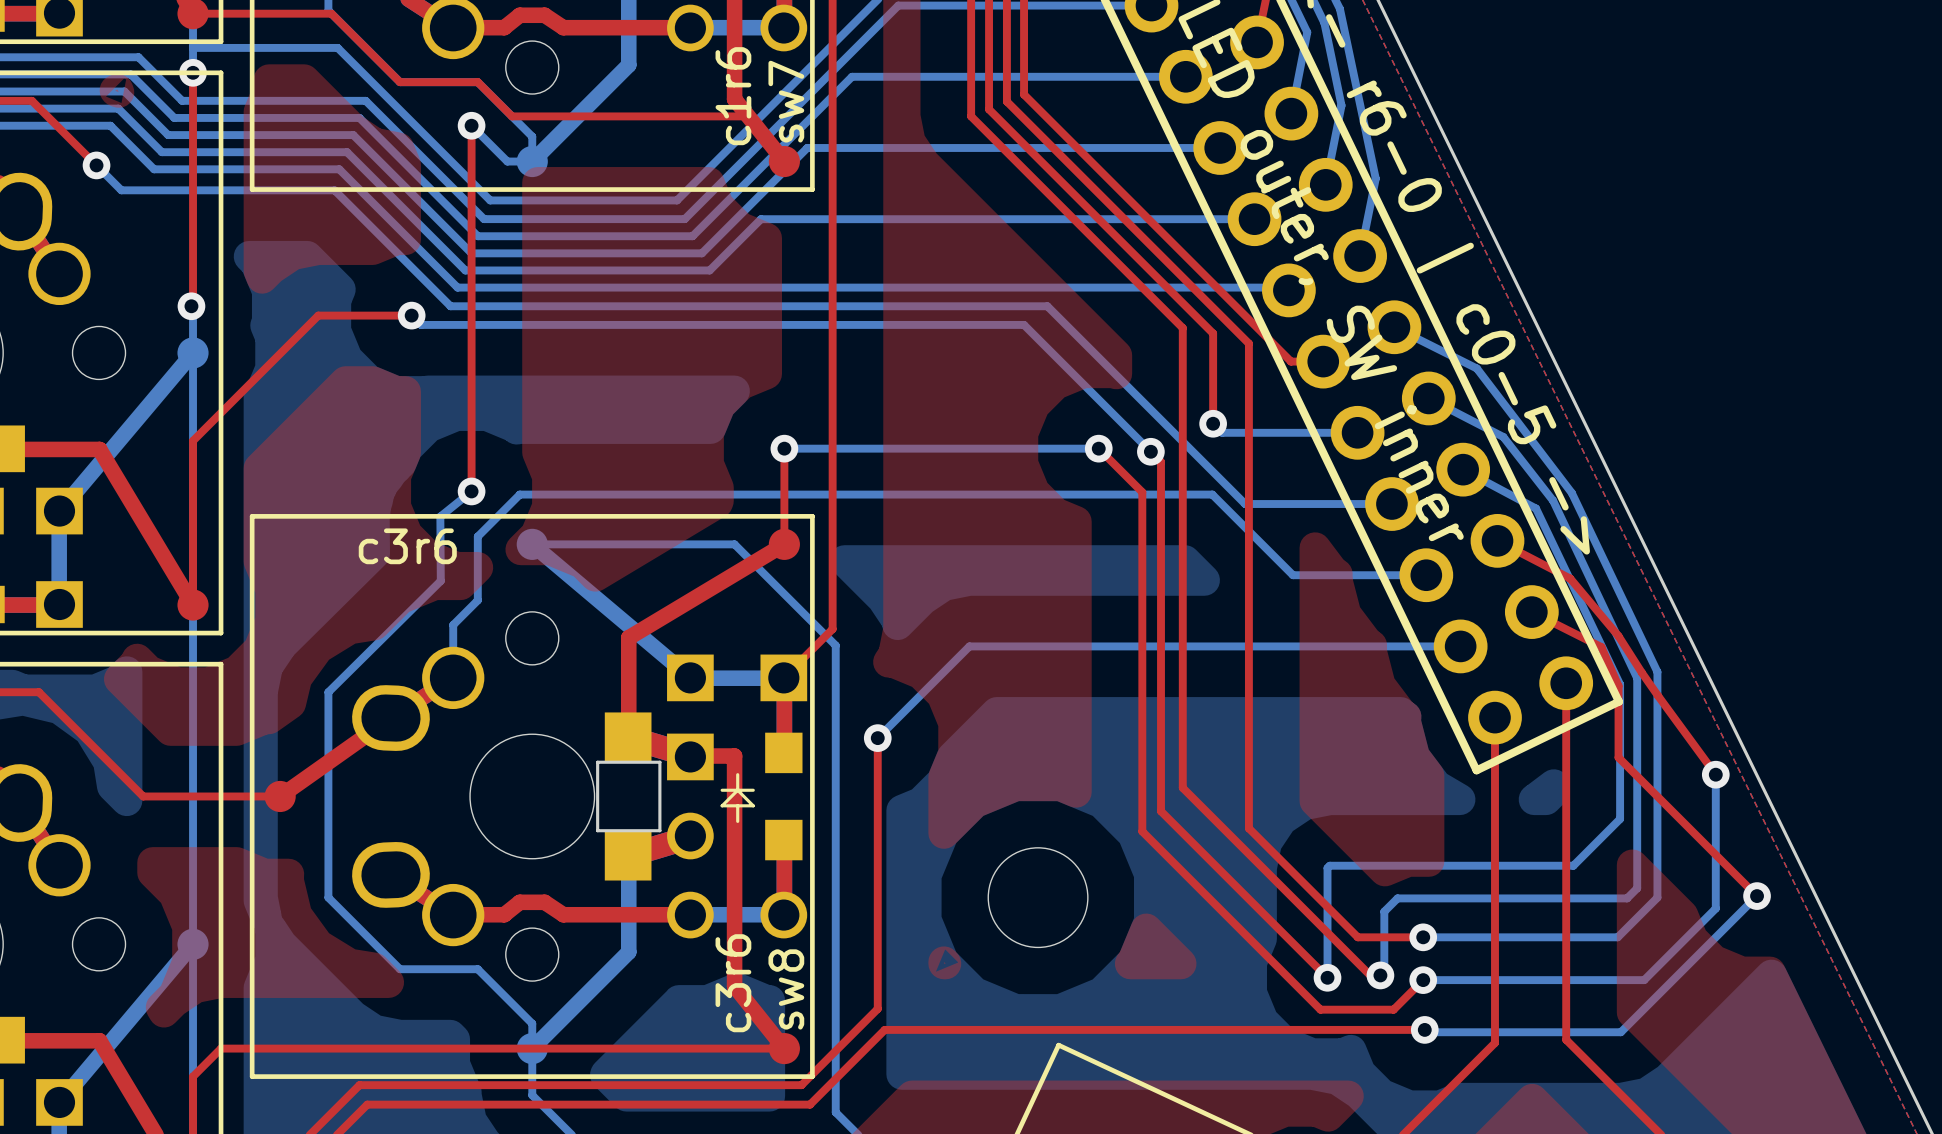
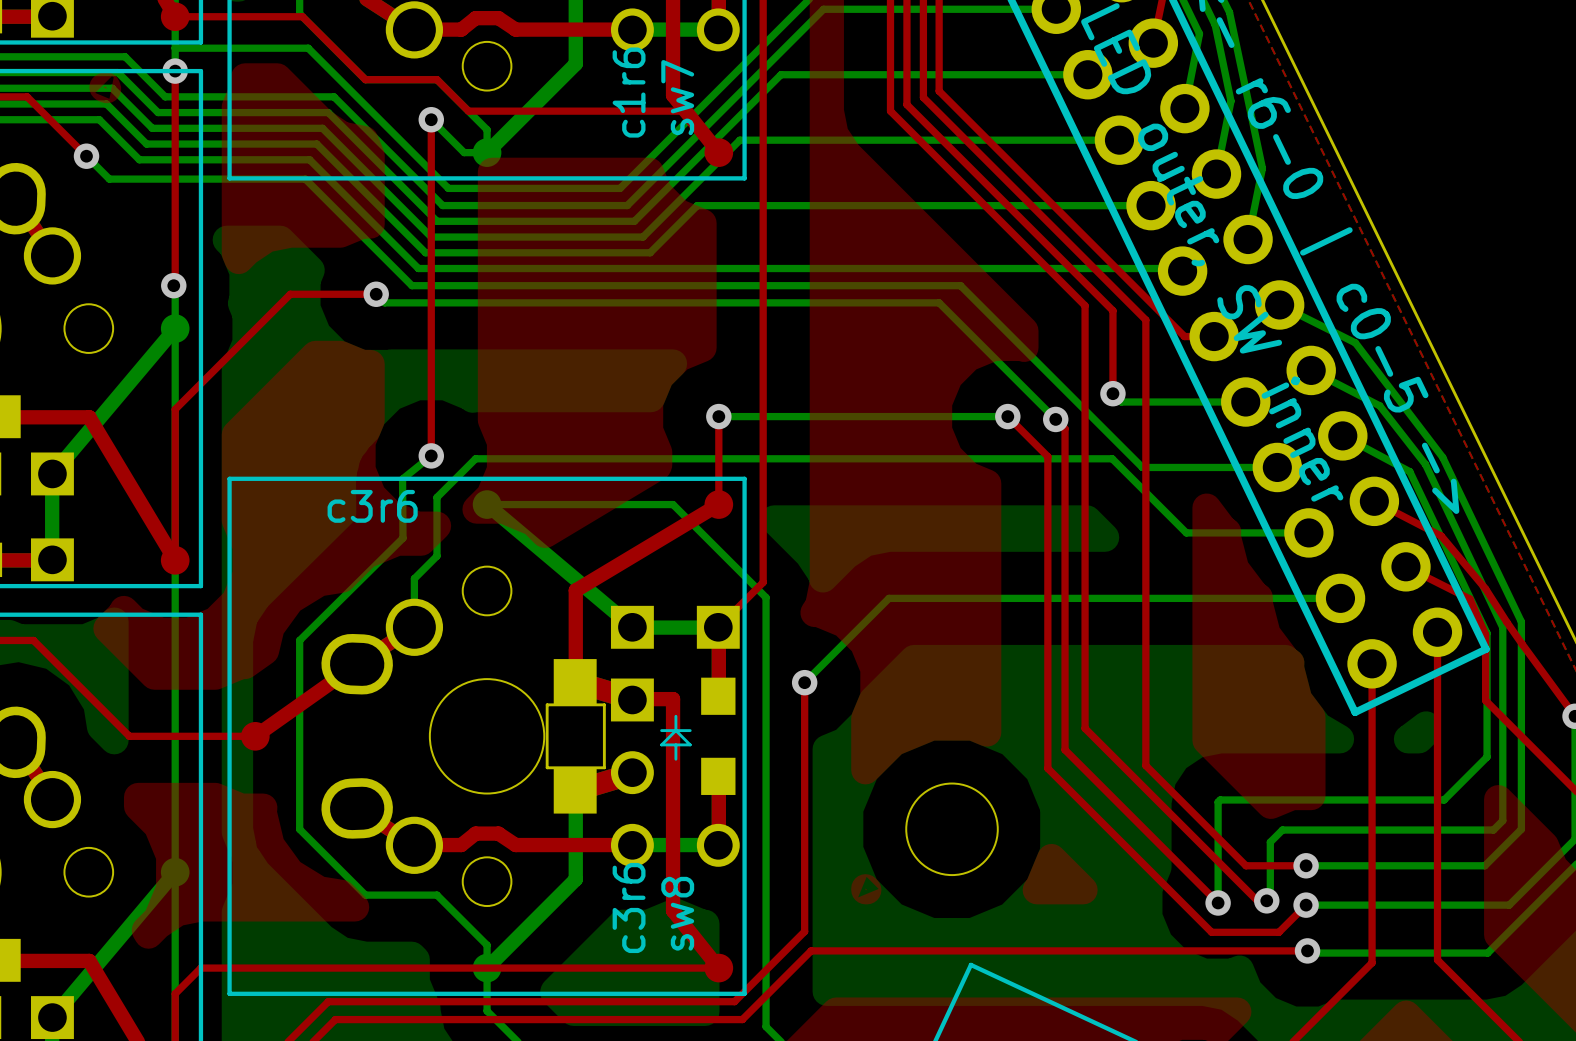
sw7 value position: c1r6 (733, 96) -> c1r6 (629, 92)
sw7 name position: sw7 (786, 101) -> sw7 (677, 97)
sw8 value position: c3r6 (733, 983) -> c3r6 (629, 907)
sw8 name position: sw8 (786, 989) -> sw8 (677, 913)

